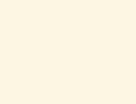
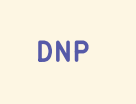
text: none -> DNP (63, 51)

